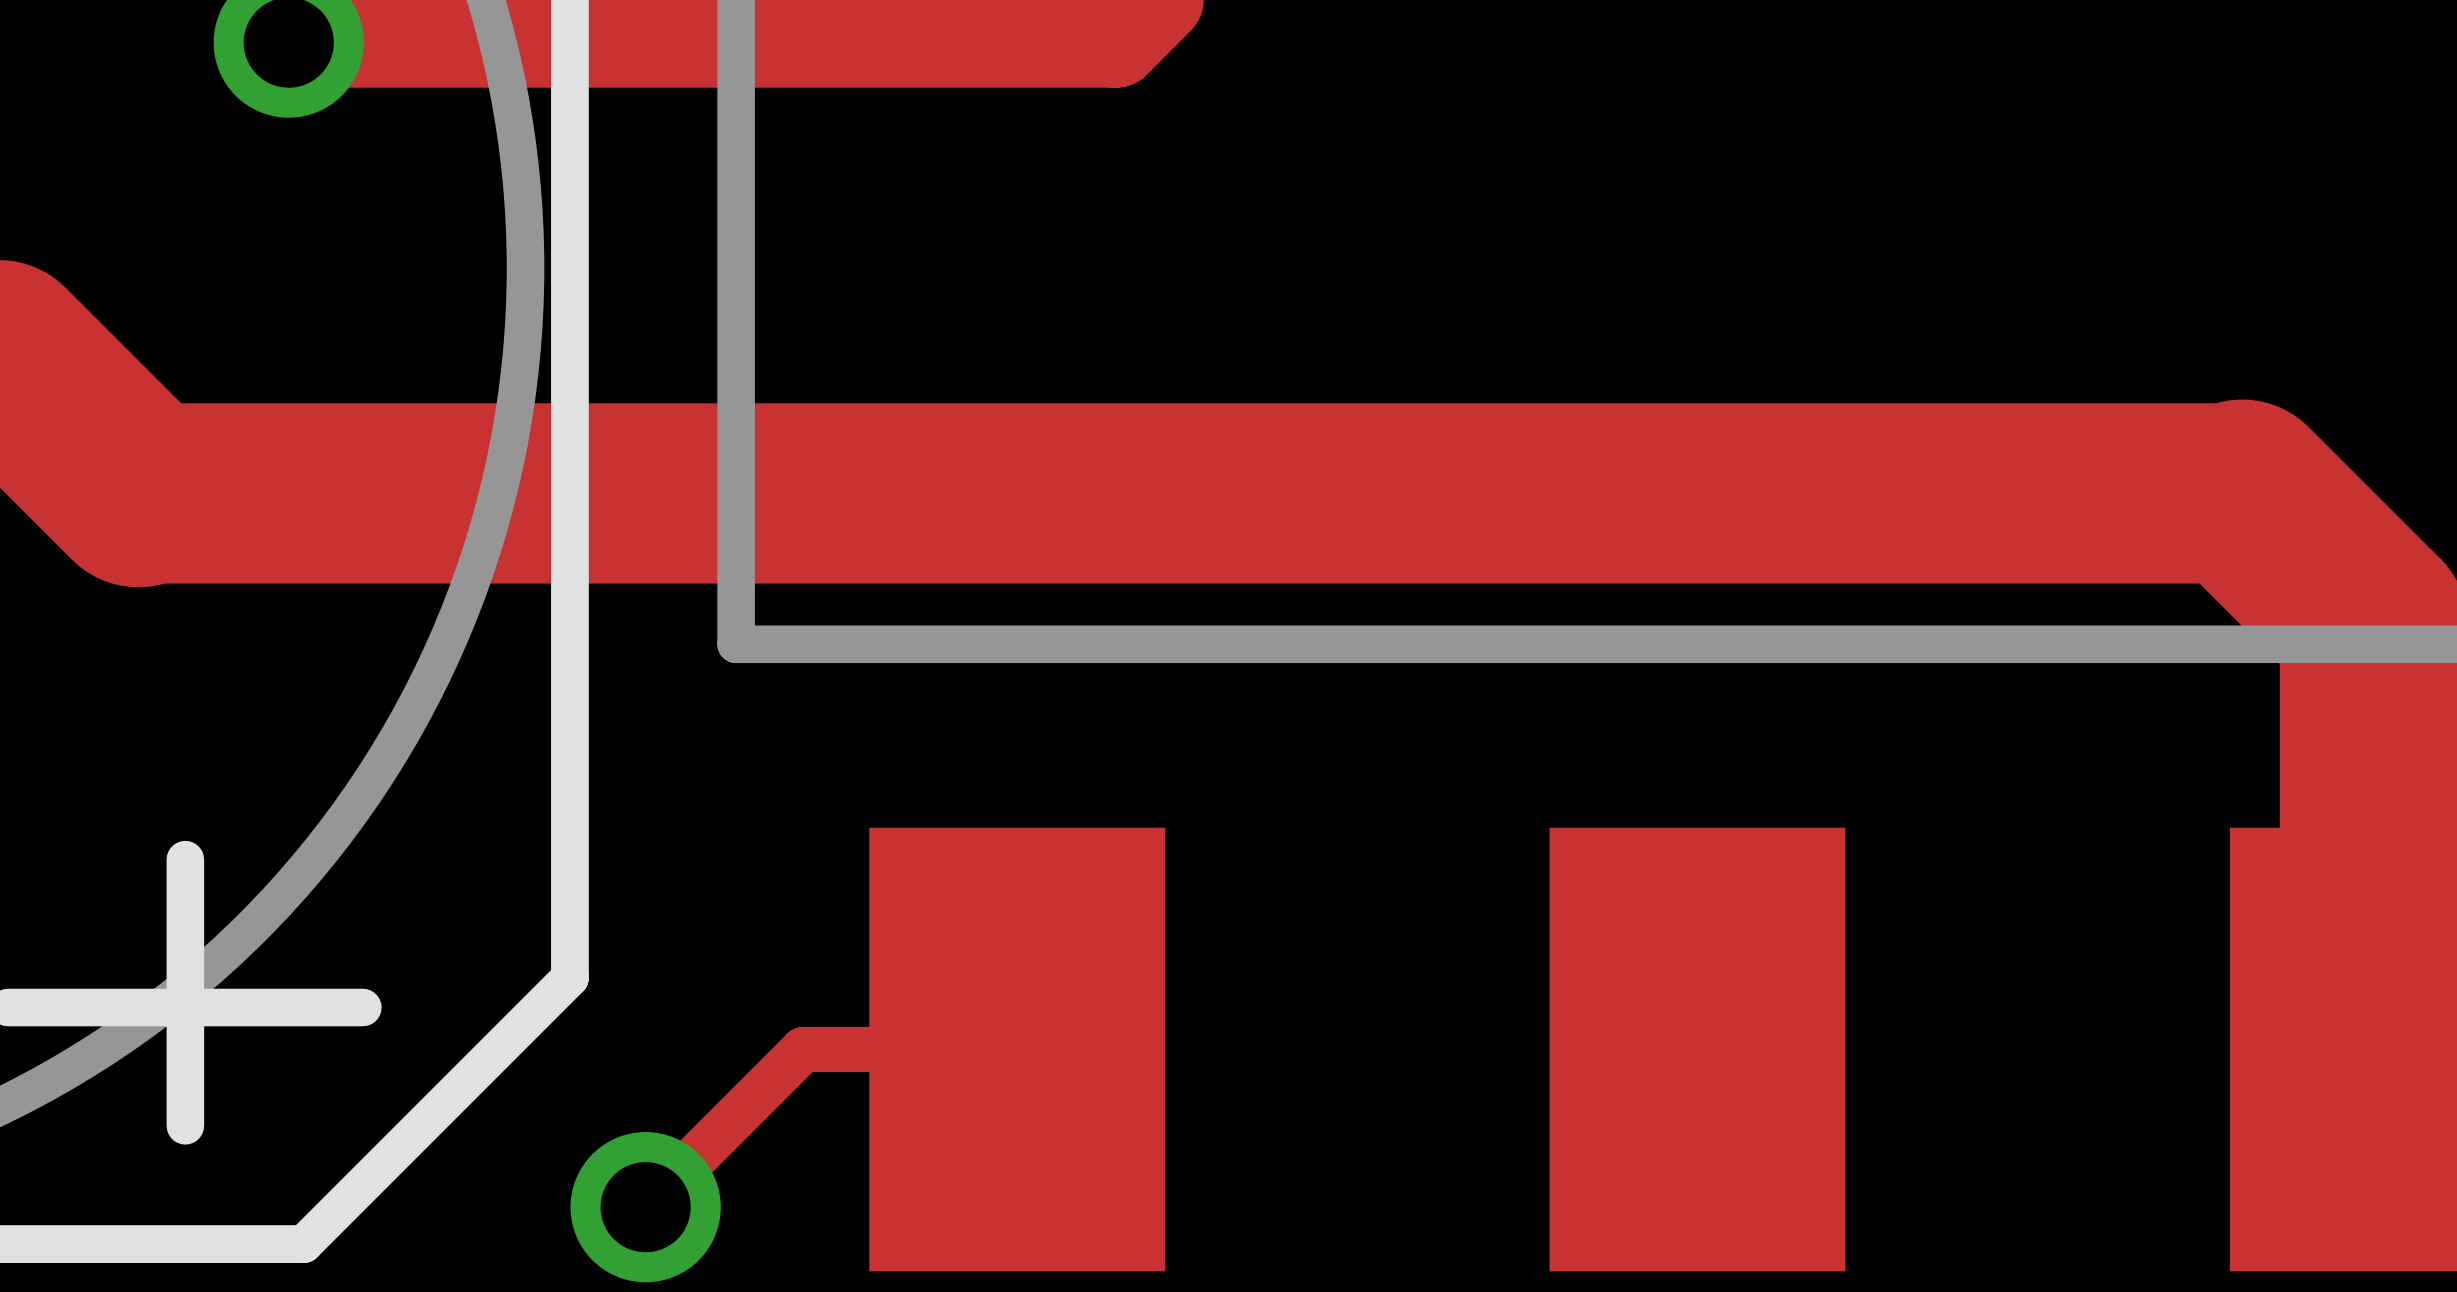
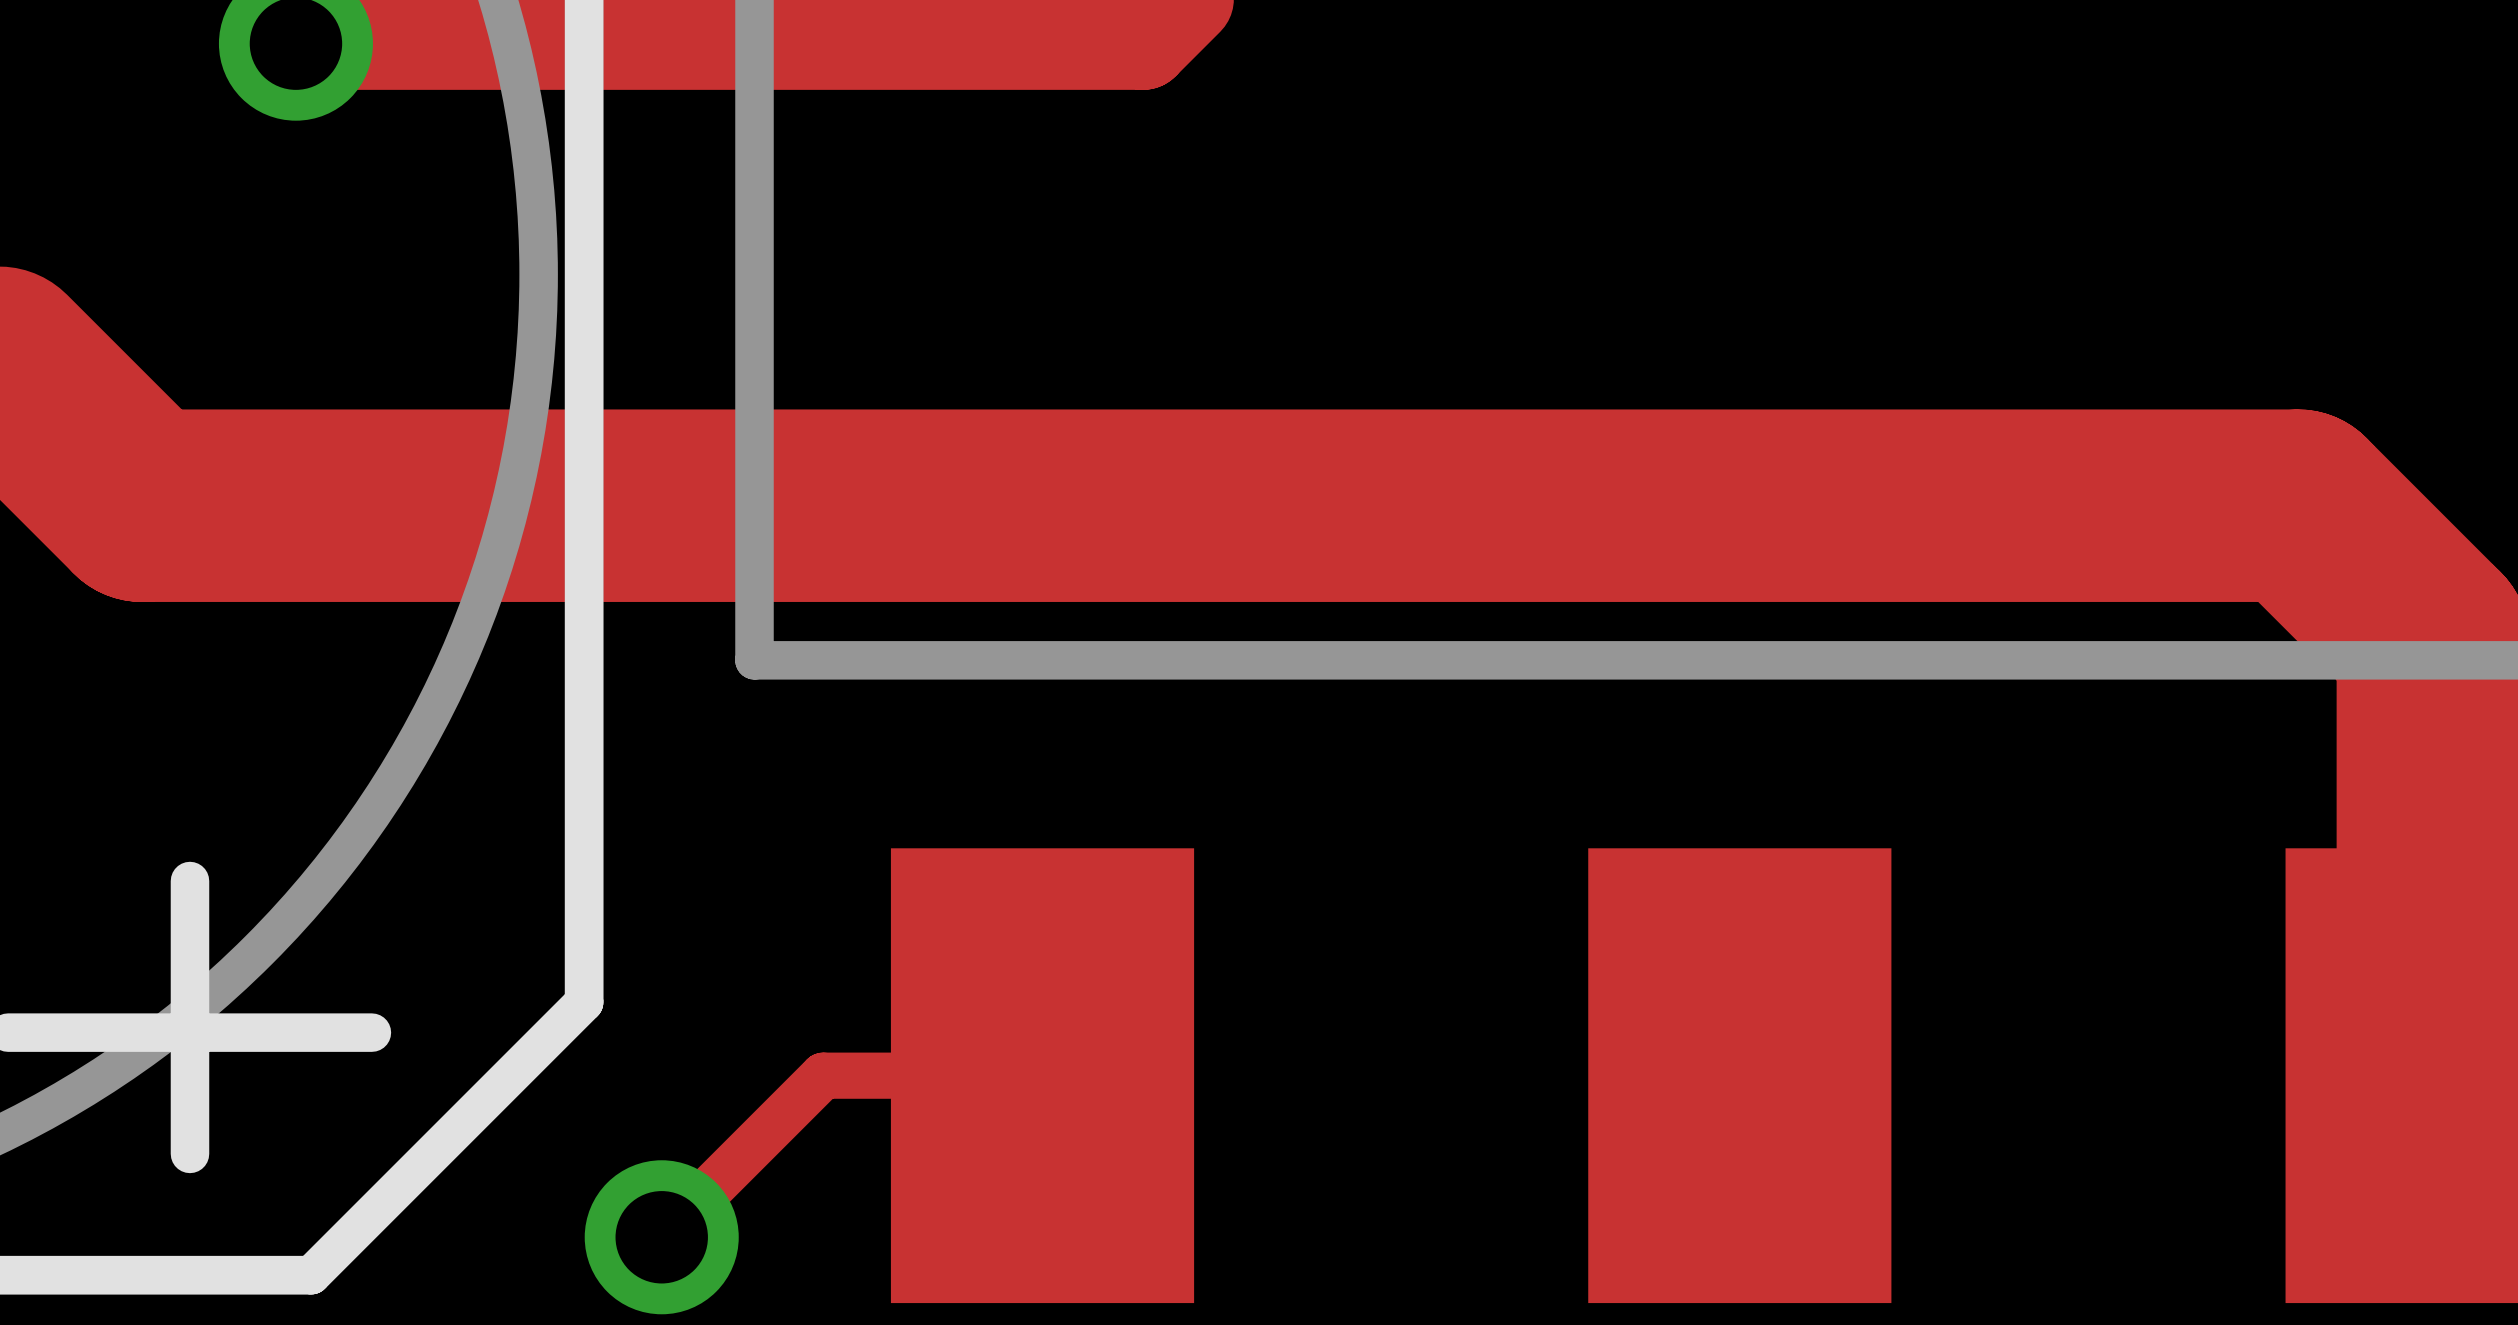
track width: thin (138, 493) (2242, 493) -> thick (141, 505) (2298, 505)

